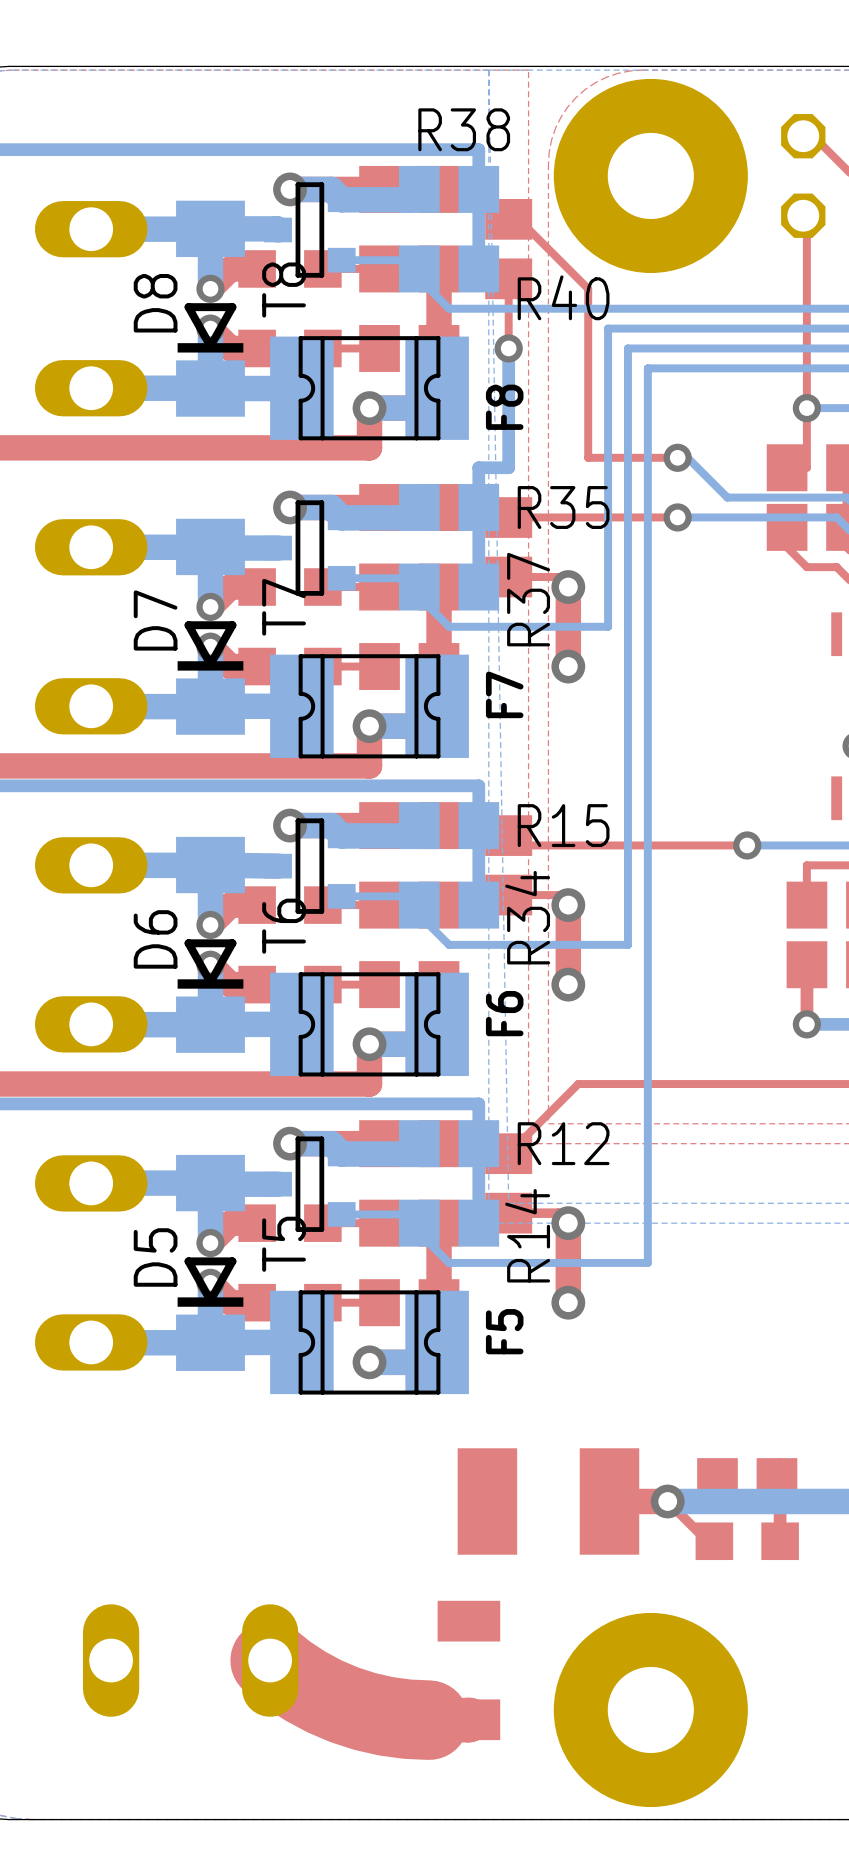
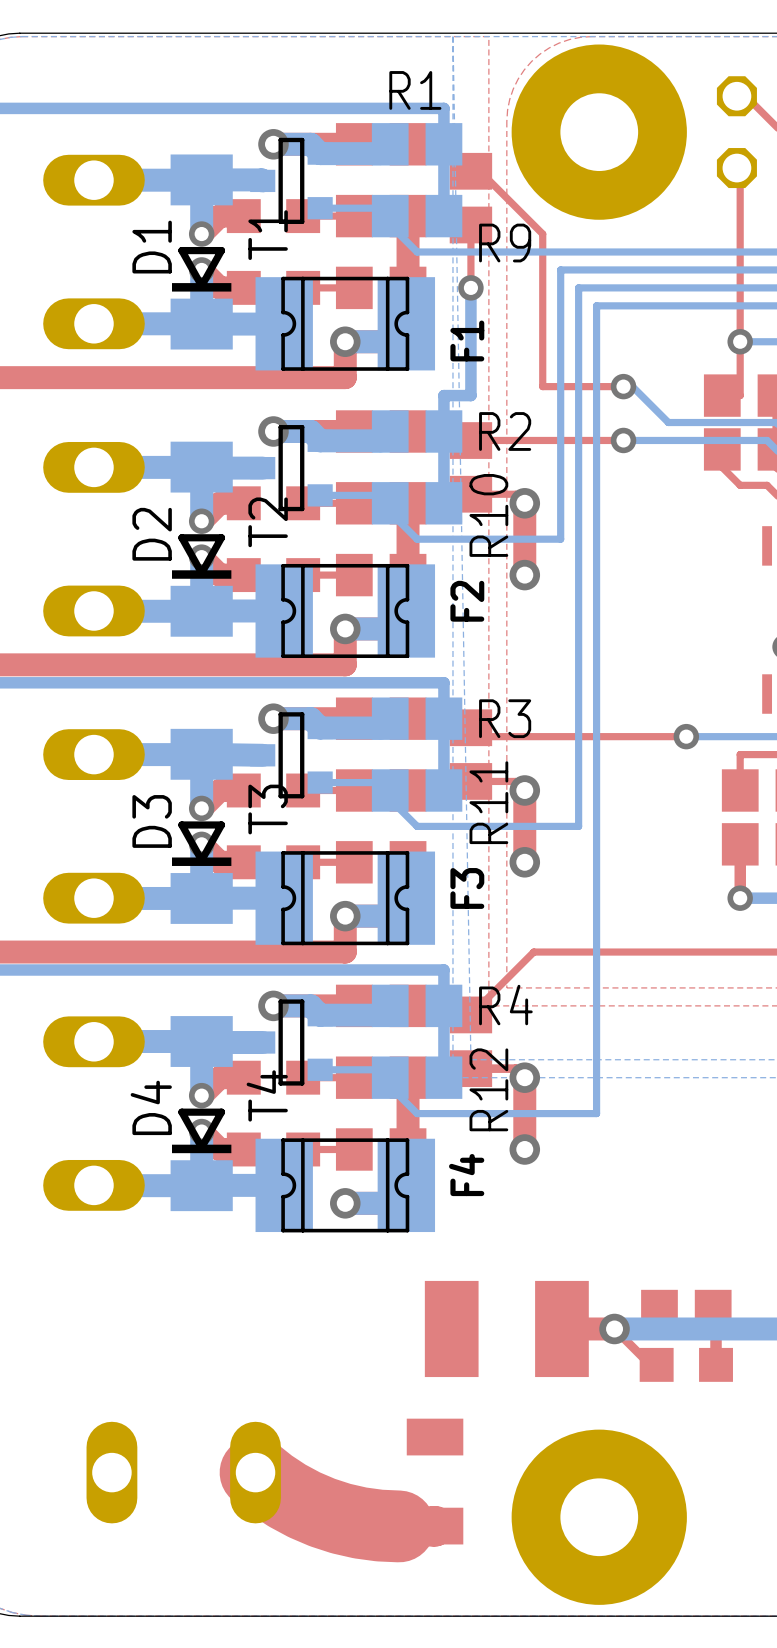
R38 name: R38 (464, 129) -> R1 (415, 90)
T8 name: T8 (284, 290) -> T1 (268, 235)
R40 name: R40 (563, 297) -> R9 (505, 243)
D8 name: D8 (155, 303) -> D1 (152, 247)
F8 name: F8 (504, 407) -> F1 (467, 340)
R35 name: R35 (563, 507) -> R2 (505, 431)
R37 name: R37 (528, 599) -> R10 (488, 515)
T7 name: T7 (284, 607) -> T2 (268, 522)
D7 name: D7 (155, 620) -> D2 (152, 534)
F7 name: F7 (504, 694) -> F2 (467, 601)
R15 name: R15 (563, 825) -> R3 (505, 718)
R34 name: R34 (527, 917) -> R11 (488, 802)
T6 name: T6 (284, 926) -> T3 (268, 809)
D6 name: D6 (155, 939) -> D3 (152, 821)
F6 name: F6 (504, 1013) -> F3 (467, 888)
R12 name: R12 (563, 1143) -> R4 (505, 1005)
R14 name: R14 (527, 1235) -> R12 (488, 1089)
T5 name: T5 (284, 1244) -> T4 (267, 1095)
D5 name: D5 (155, 1257) -> D4 (151, 1107)
F5 name: F5 (504, 1331) -> F4 (466, 1175)

